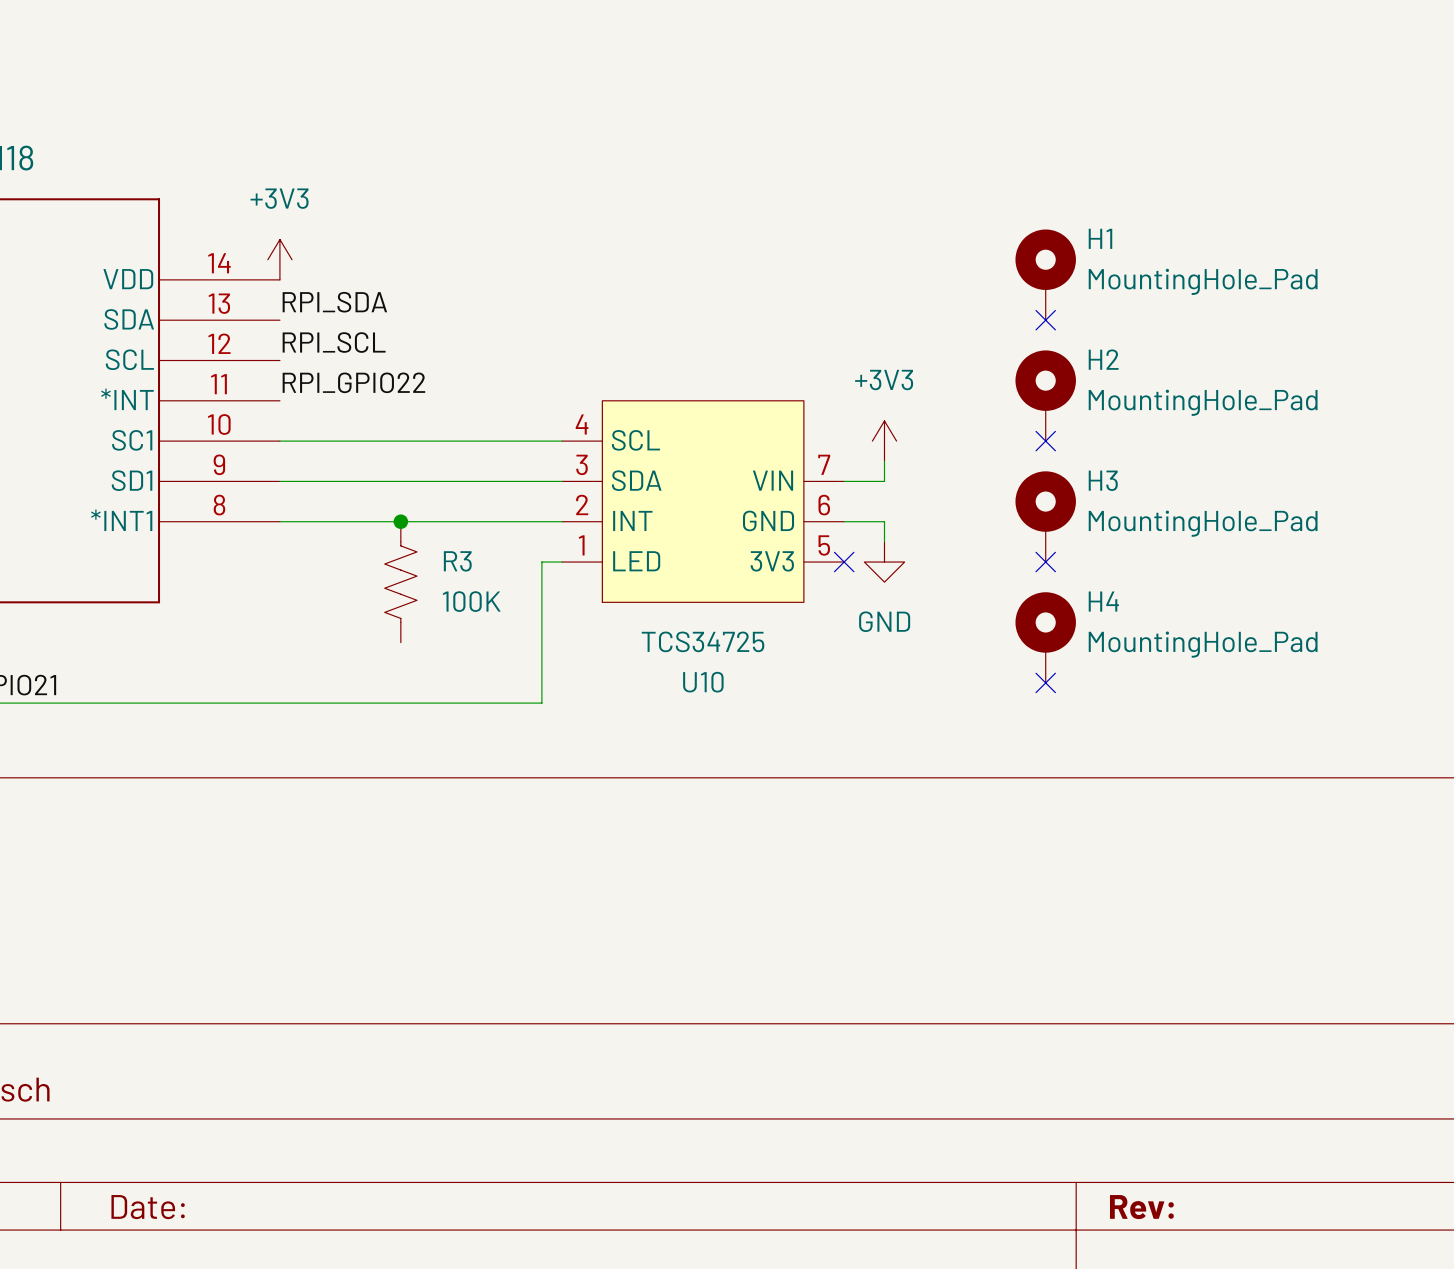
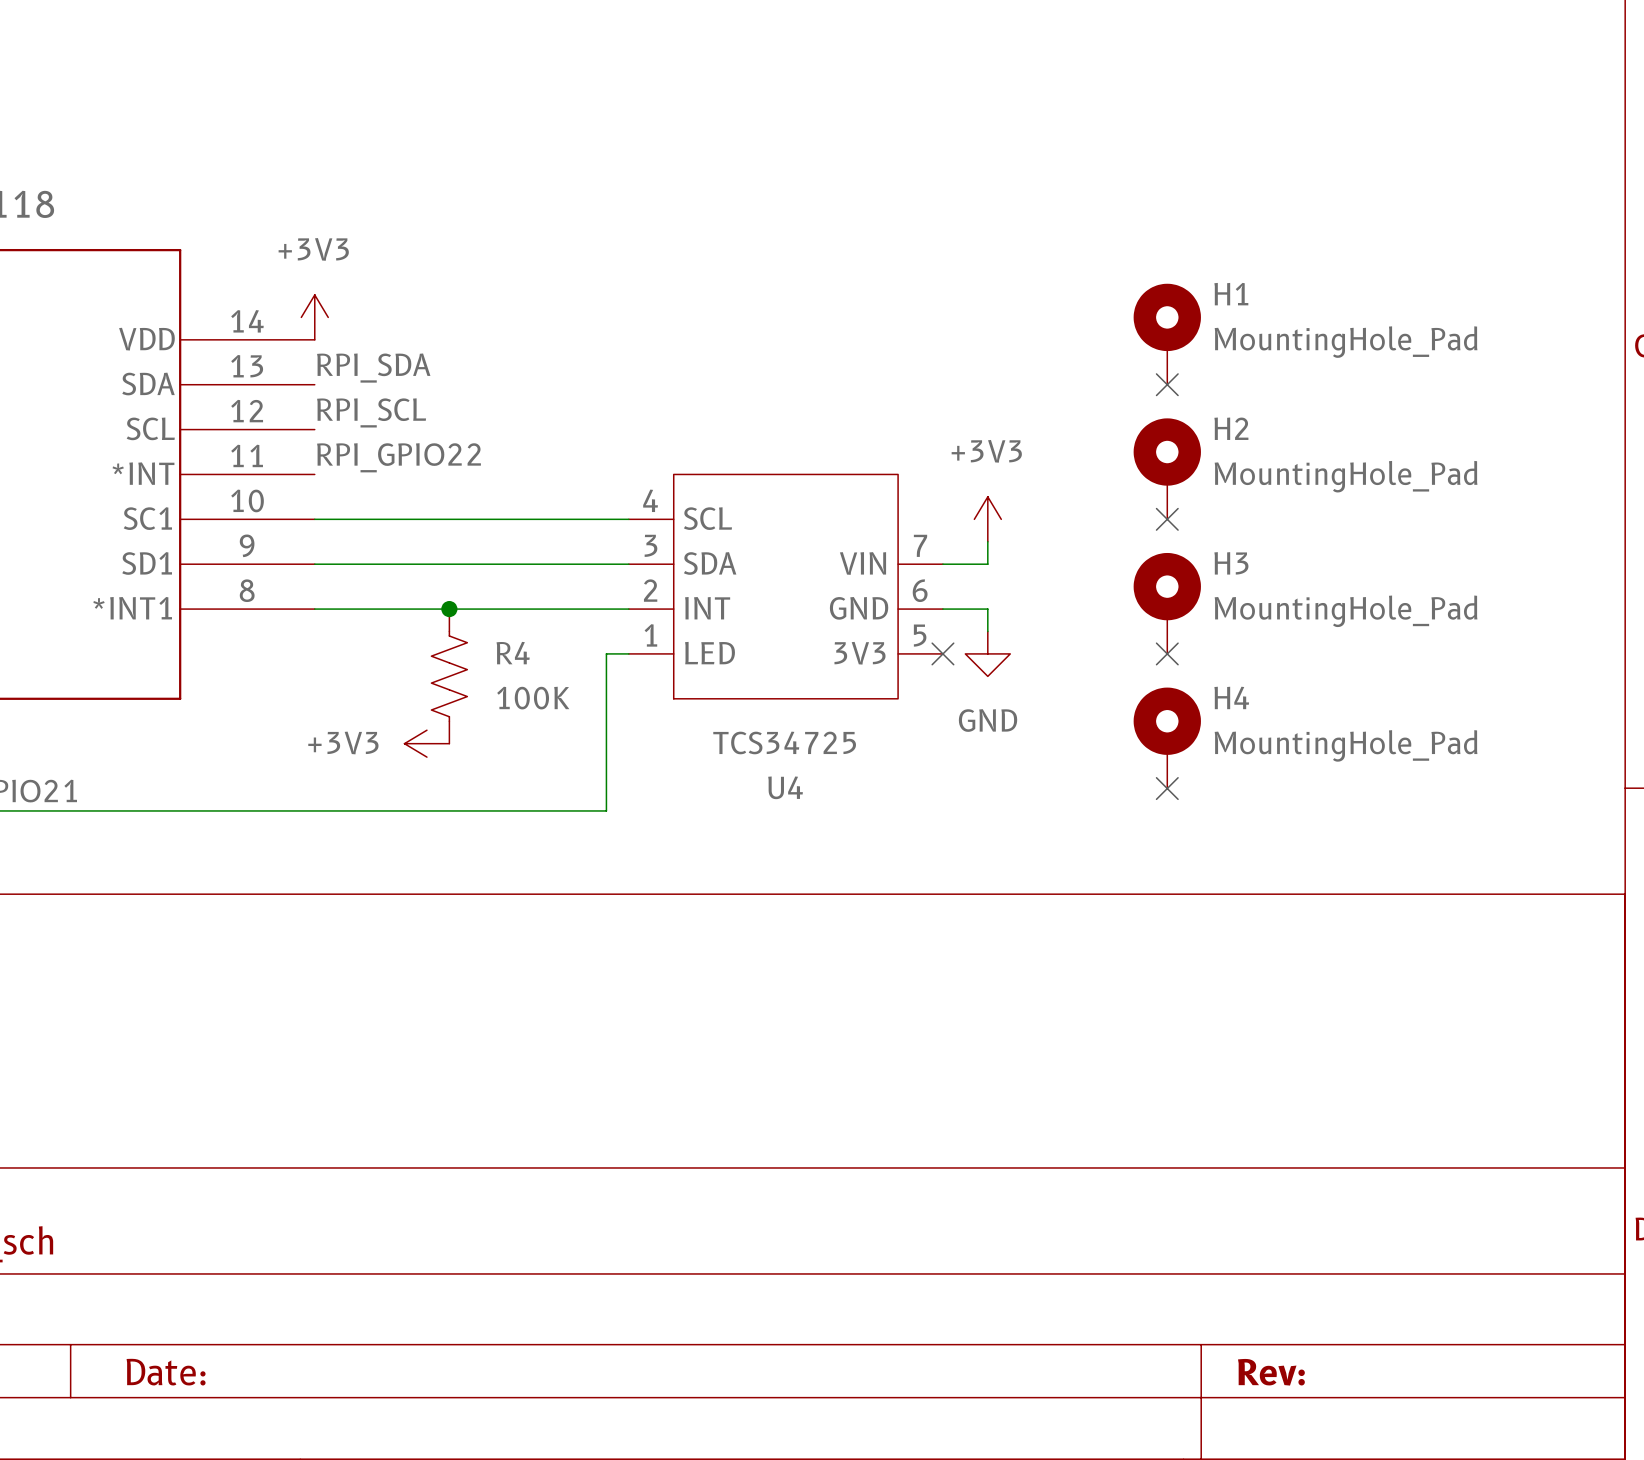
R3 name: R3 (457, 561) -> R4 (513, 653)
power symbol: none -> +3V3 (426, 743)
U10 name: U10 (703, 682) -> U4 (785, 787)

